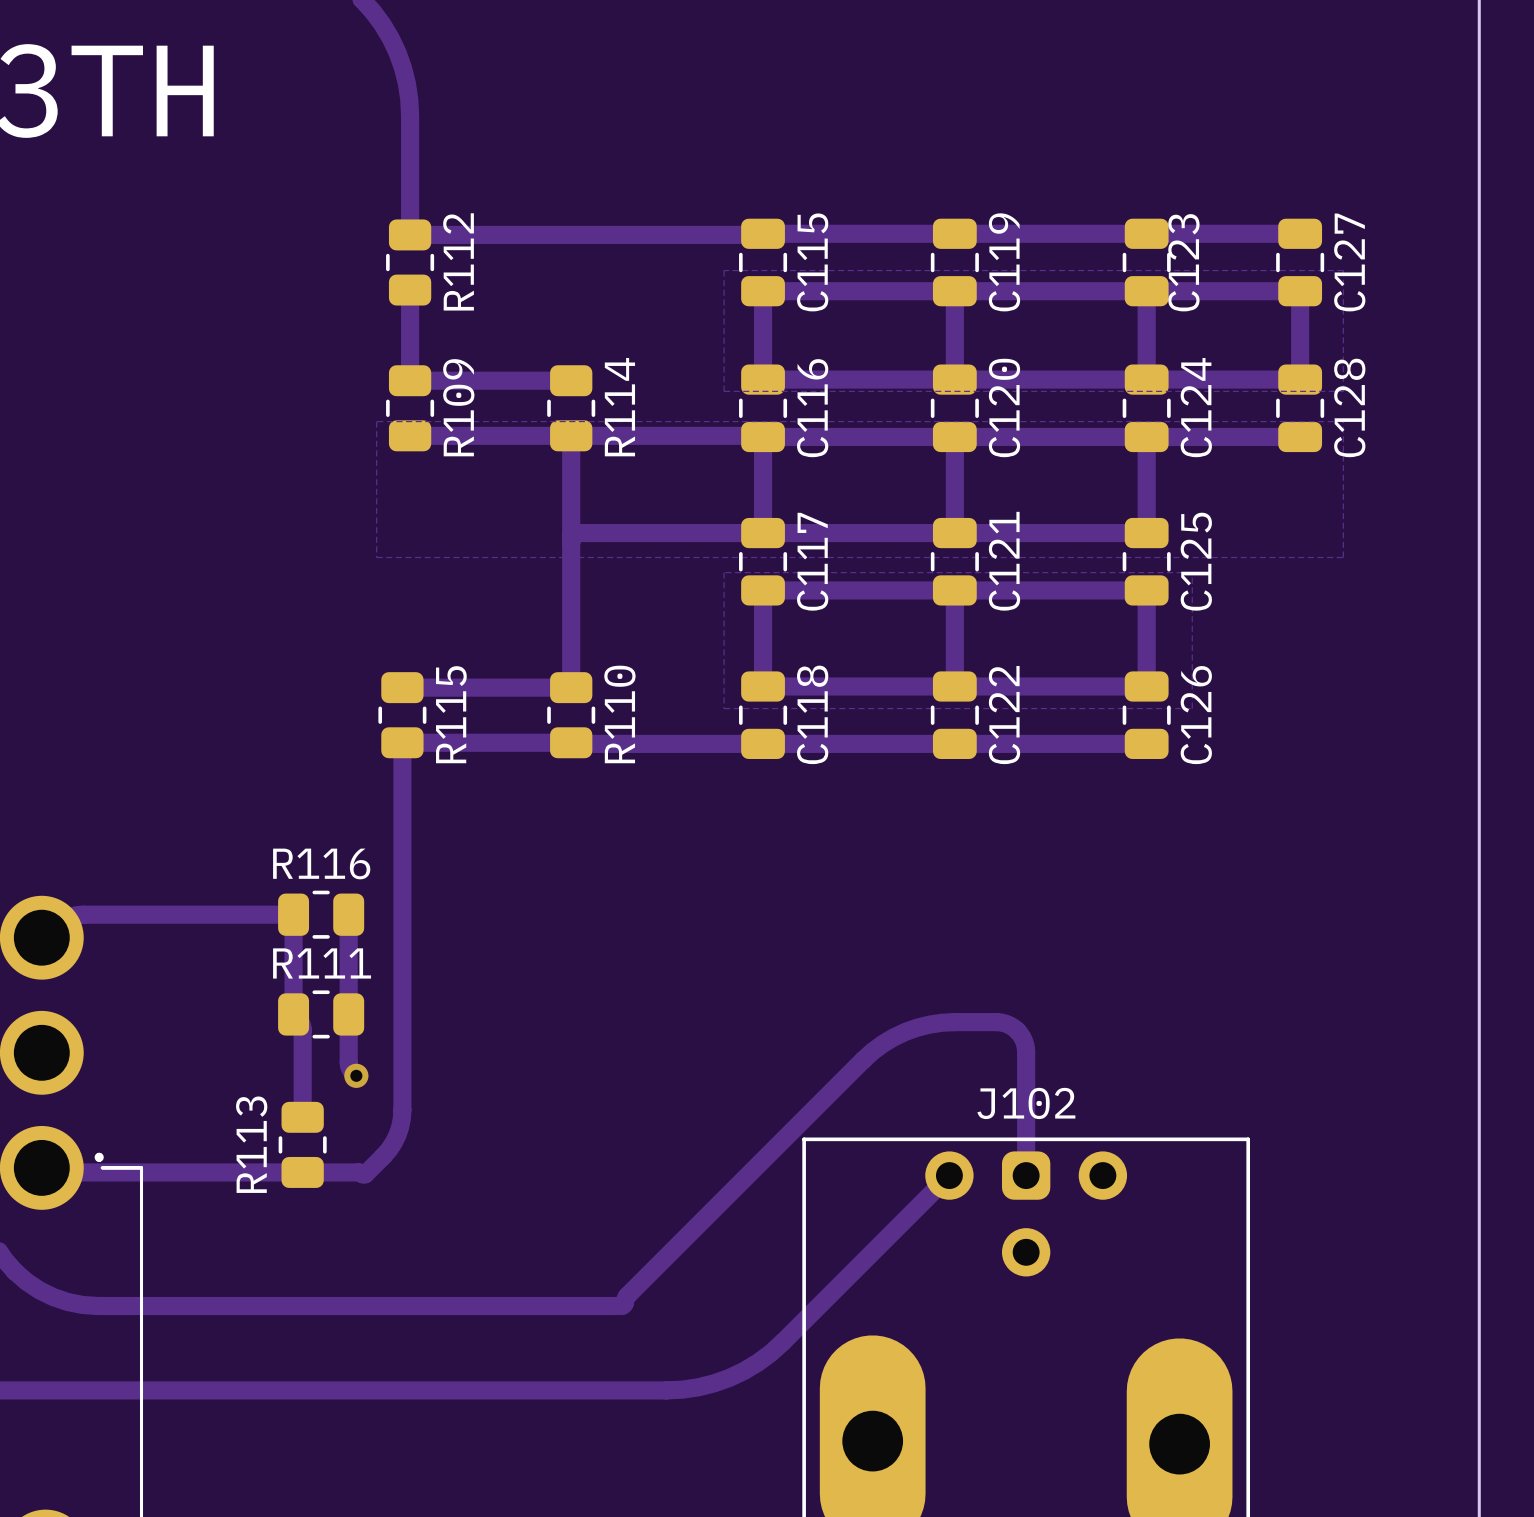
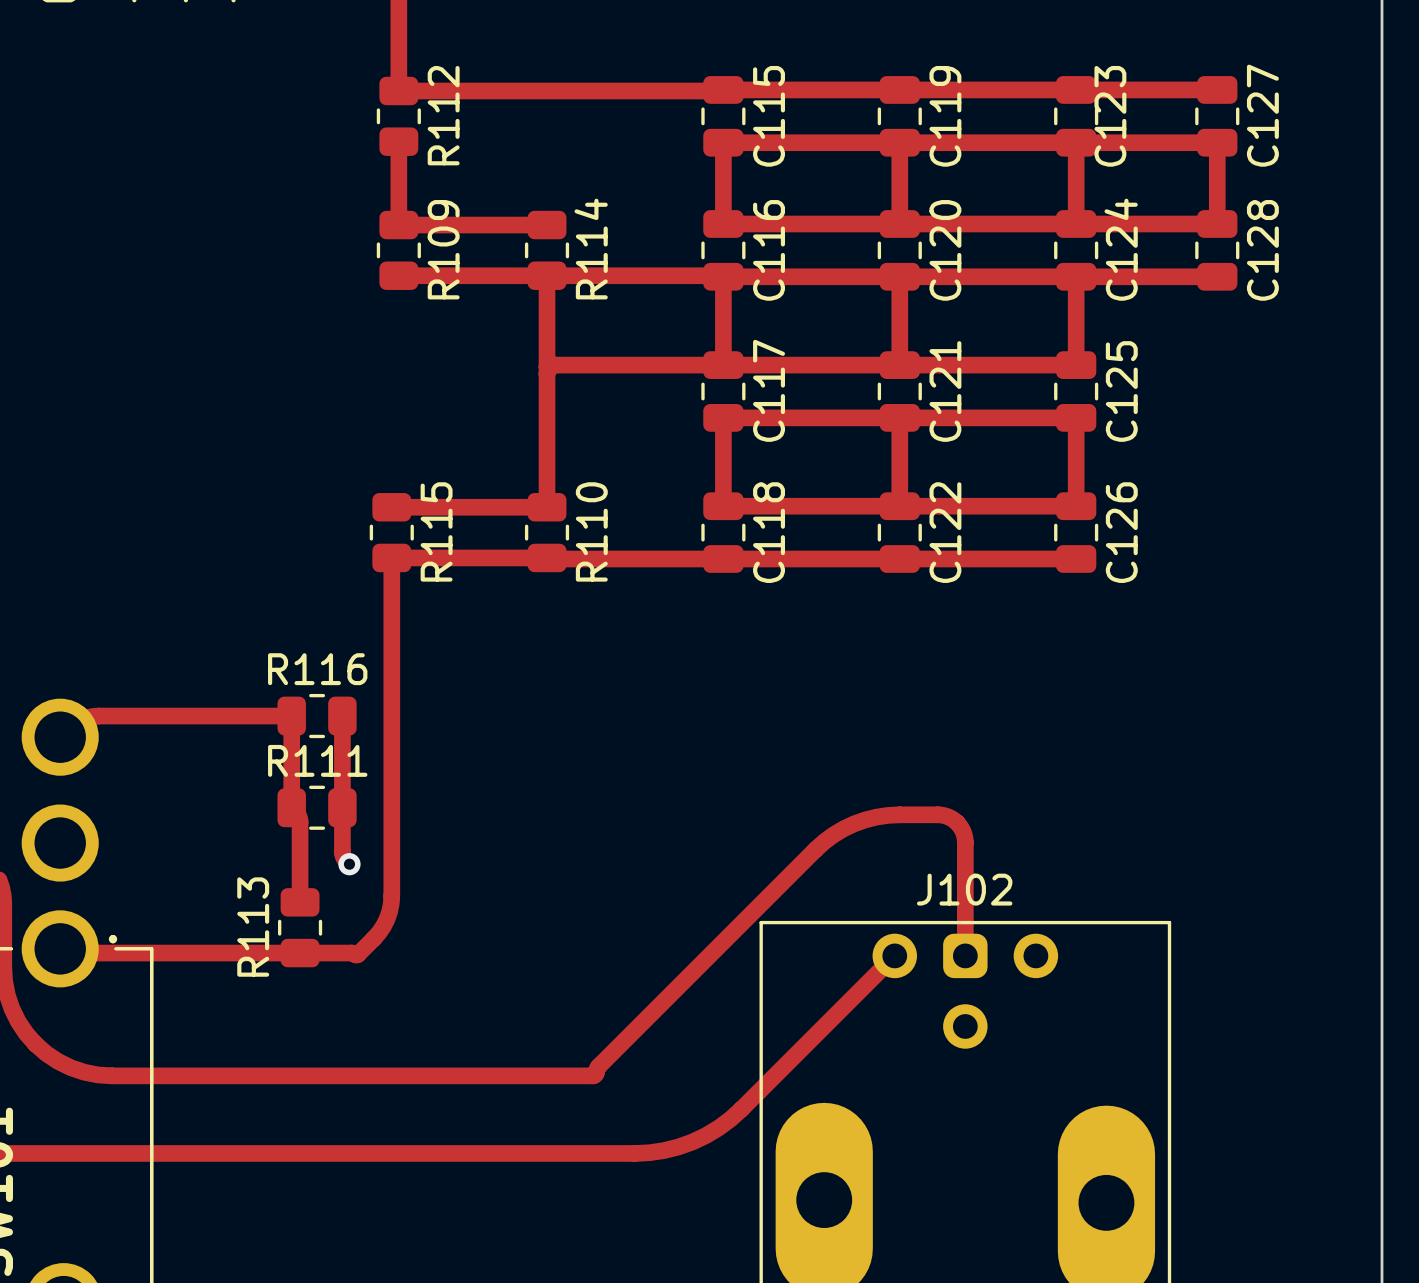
zone outline: (724, 270) (724, 391) (1343, 391) (1343, 270) (724, 270) -> none
zone outline: (376, 421) (376, 557) (1343, 557) (1343, 421) (376, 421) -> none
zone outline: (724, 572) (724, 708) (1192, 708) (1192, 572) (724, 572) -> none

